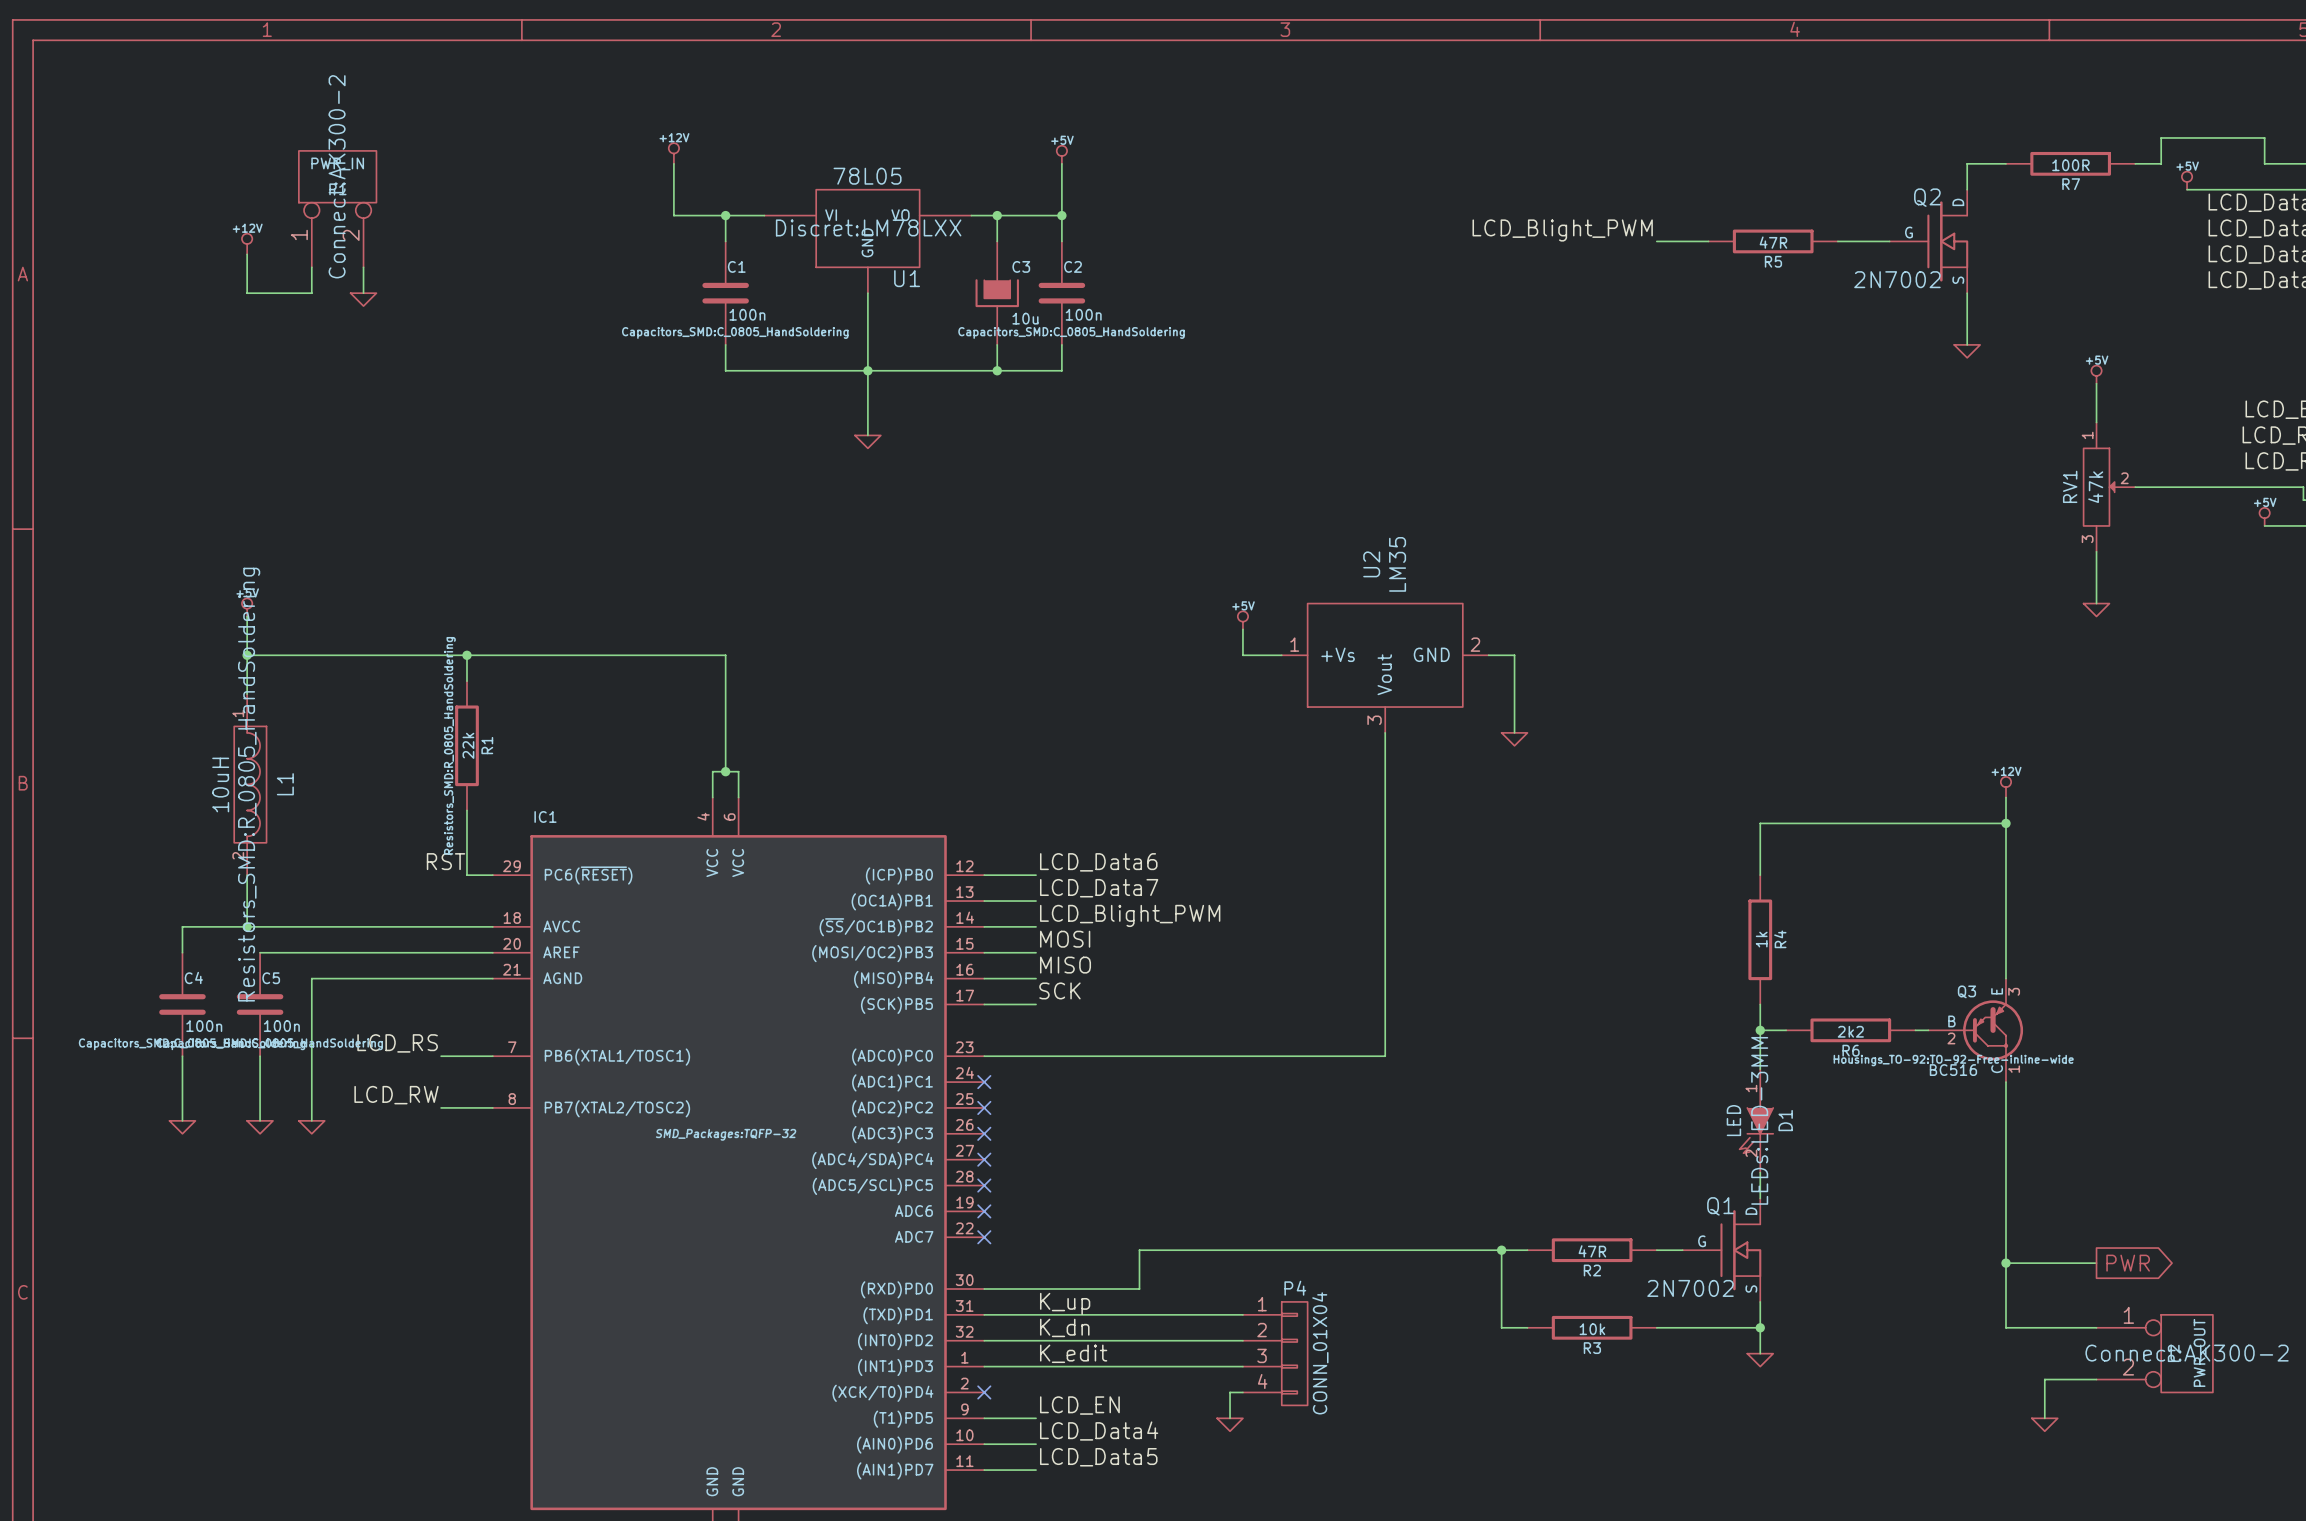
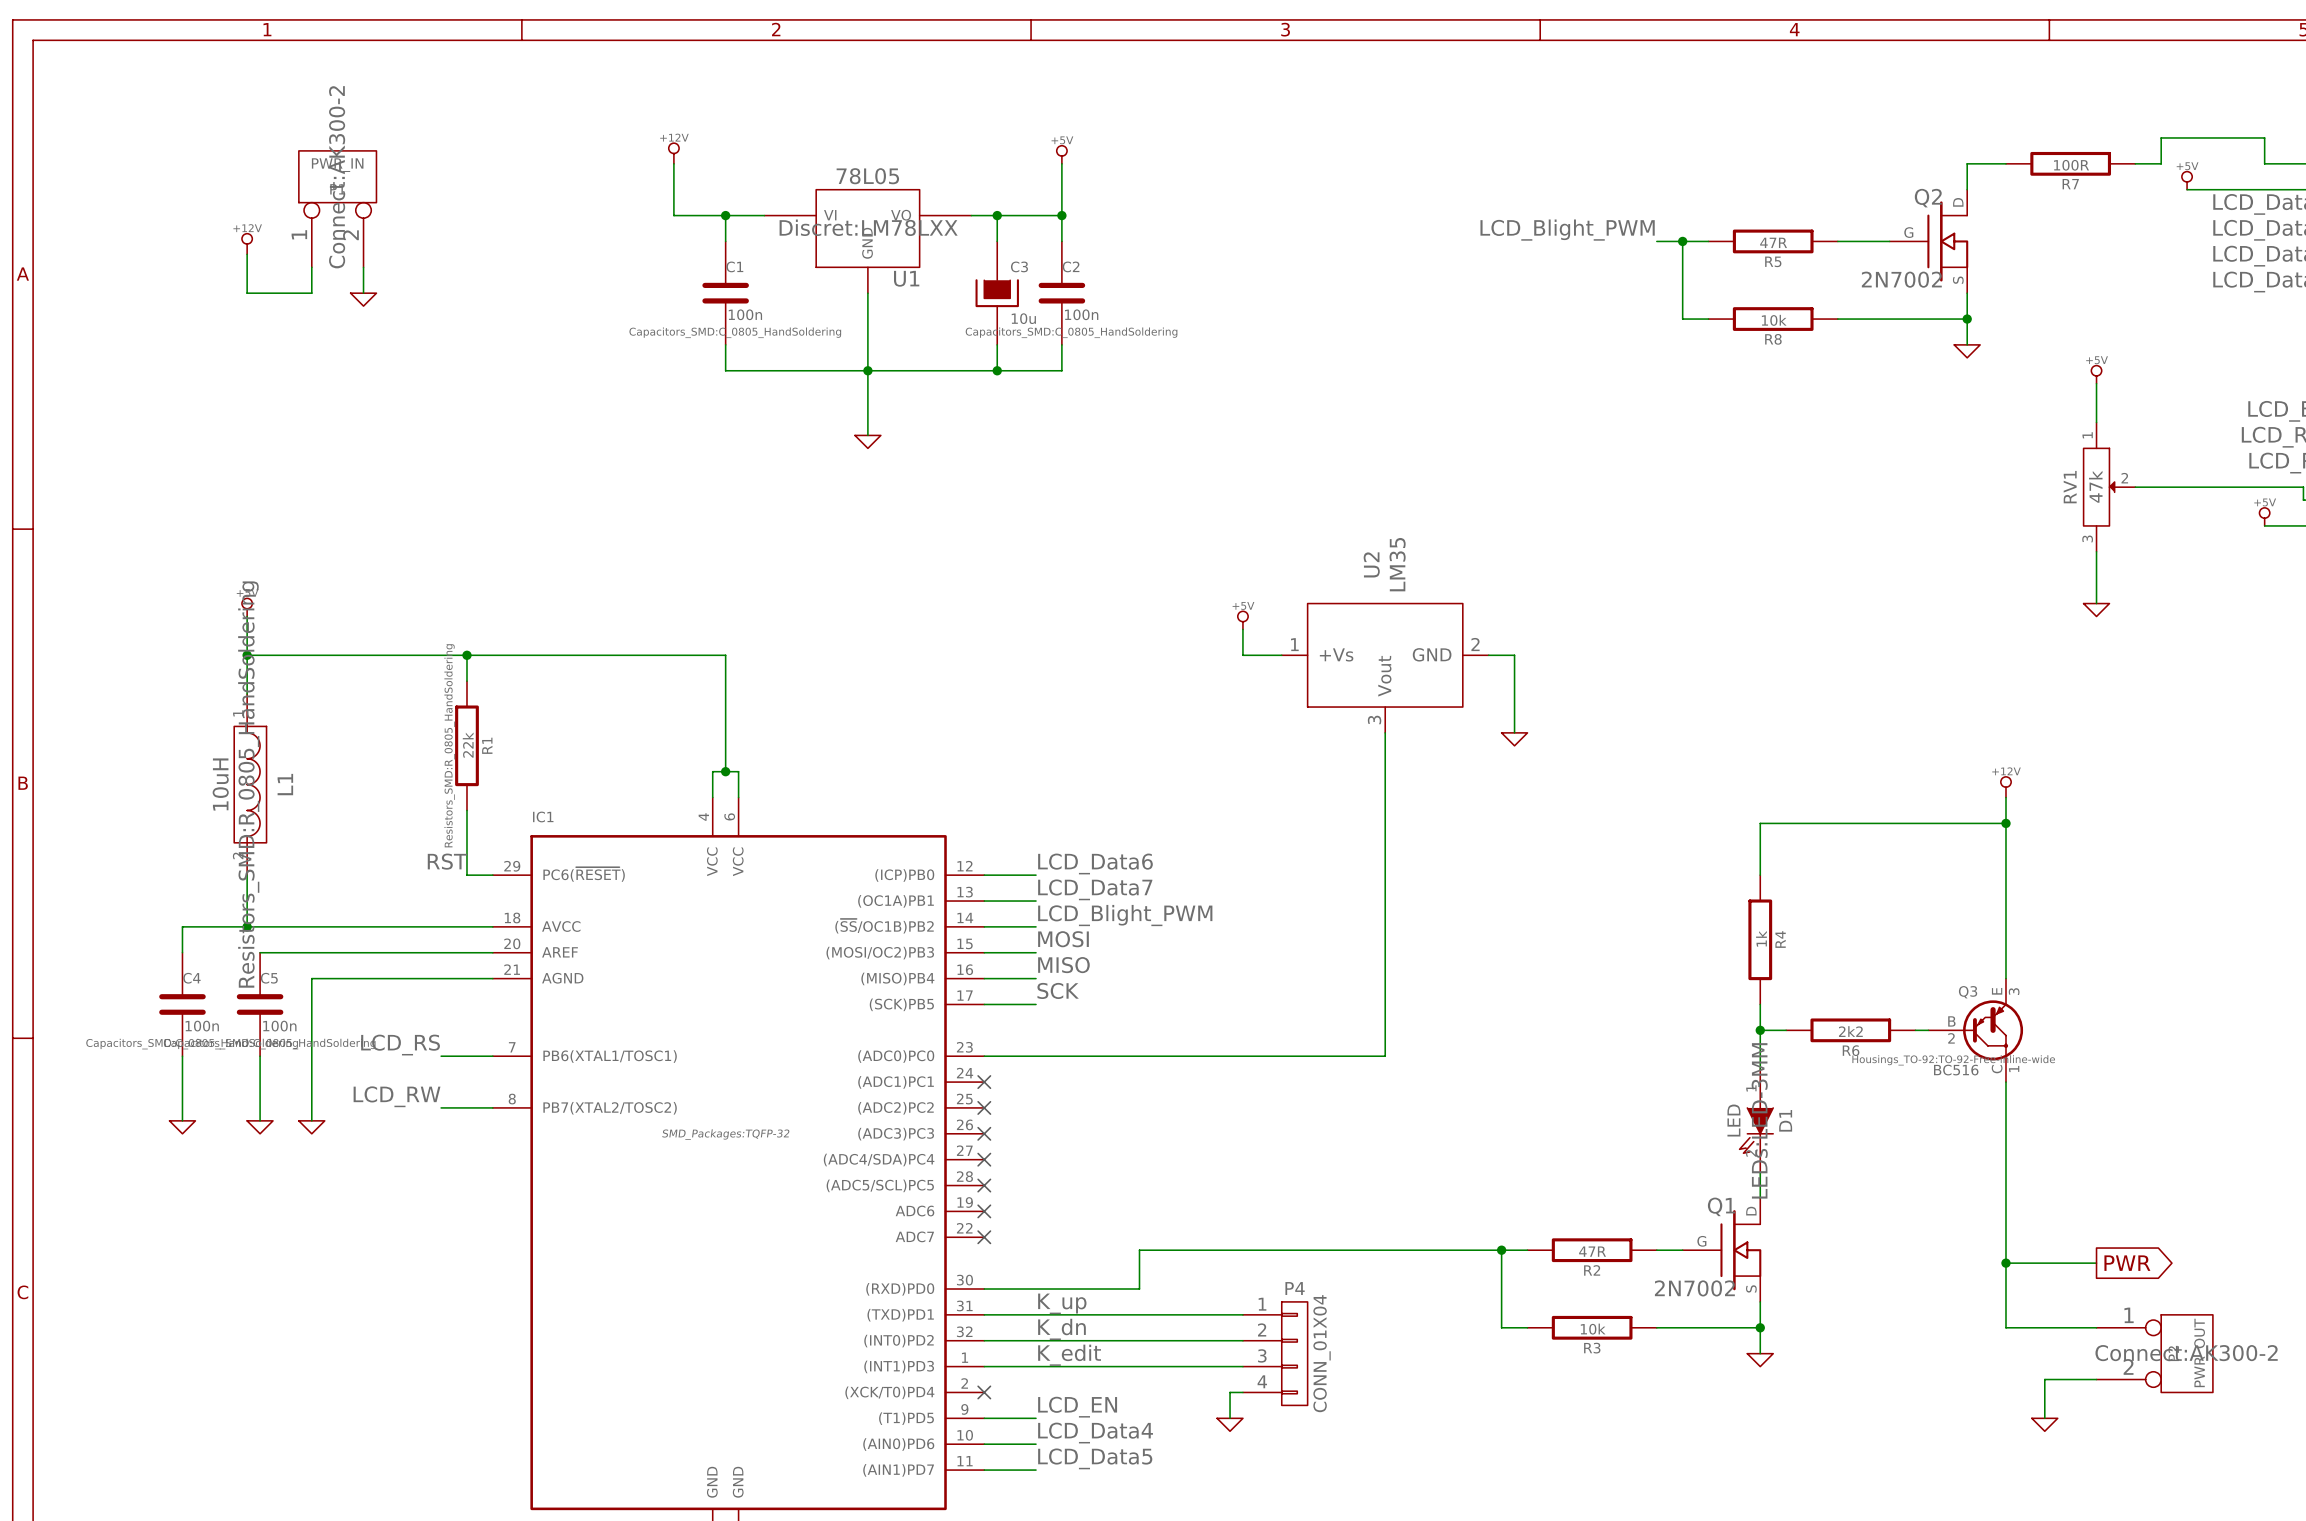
wire: none -> (1682, 241) (1682, 319) (1708, 319)
junction: none -> (1682, 241)
R8: none -> 10k (1773, 319)
wire: none -> (1837, 319) (1967, 319)
junction: none -> (1967, 319)

